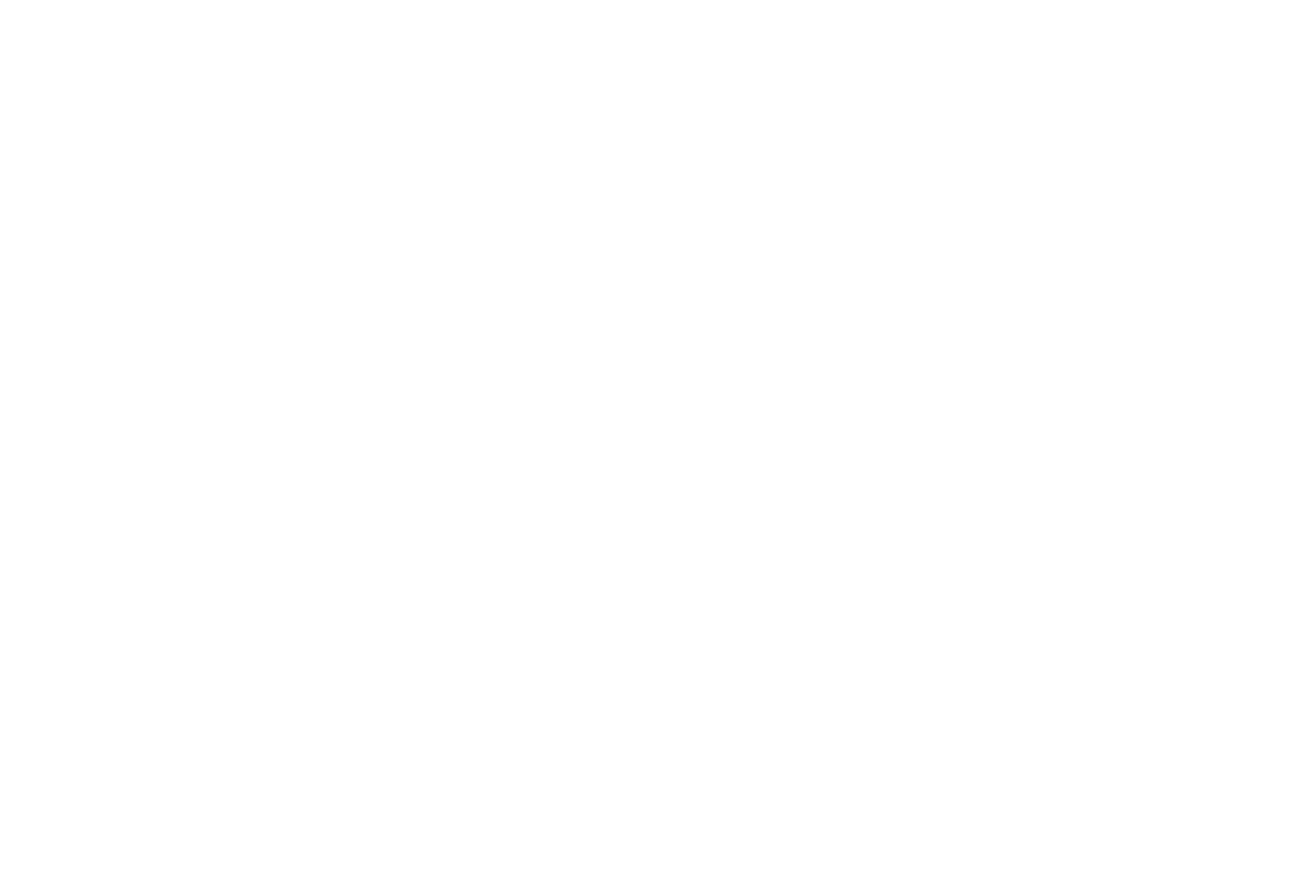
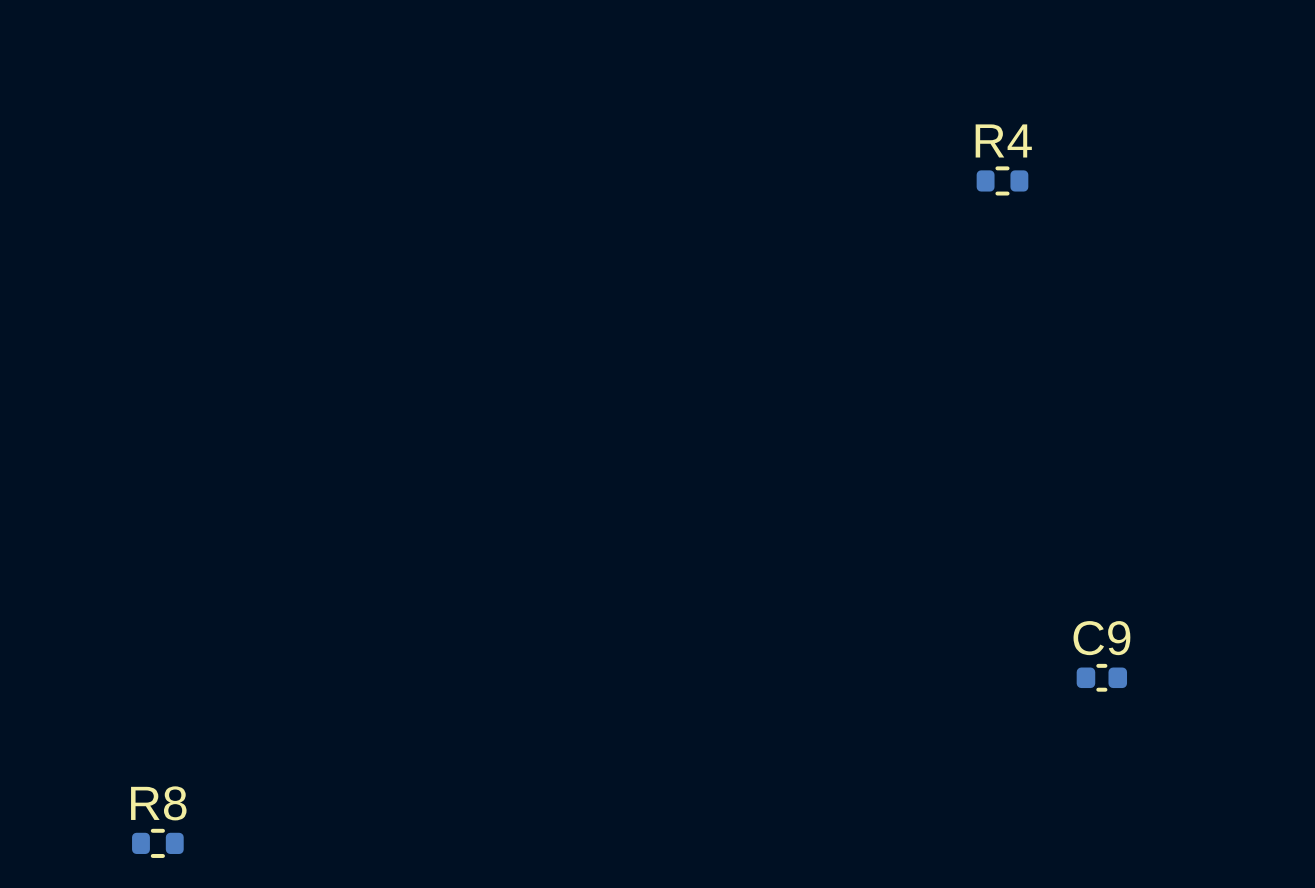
R4: none -> (1002, 180)
C9: none -> (1101, 677)
R8: none -> (157, 843)

